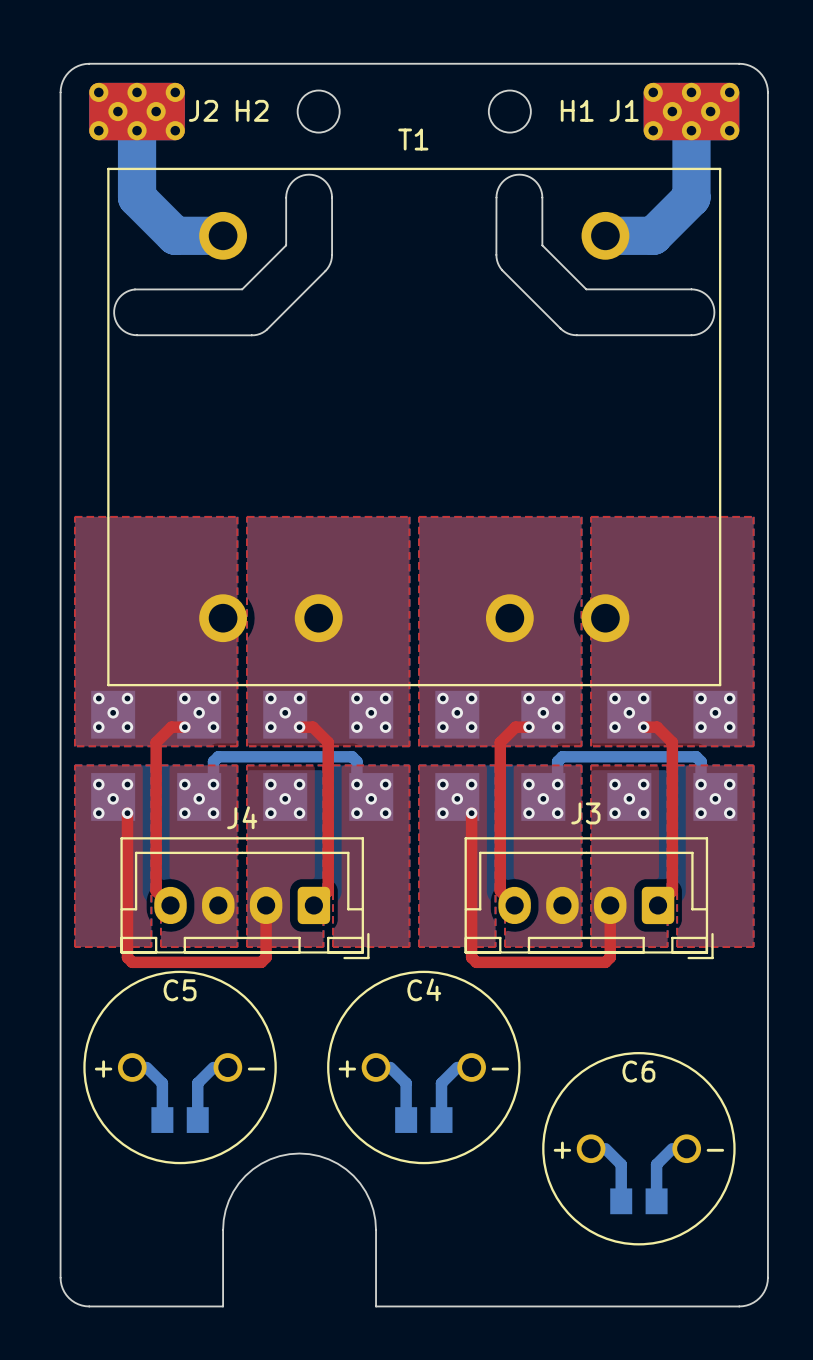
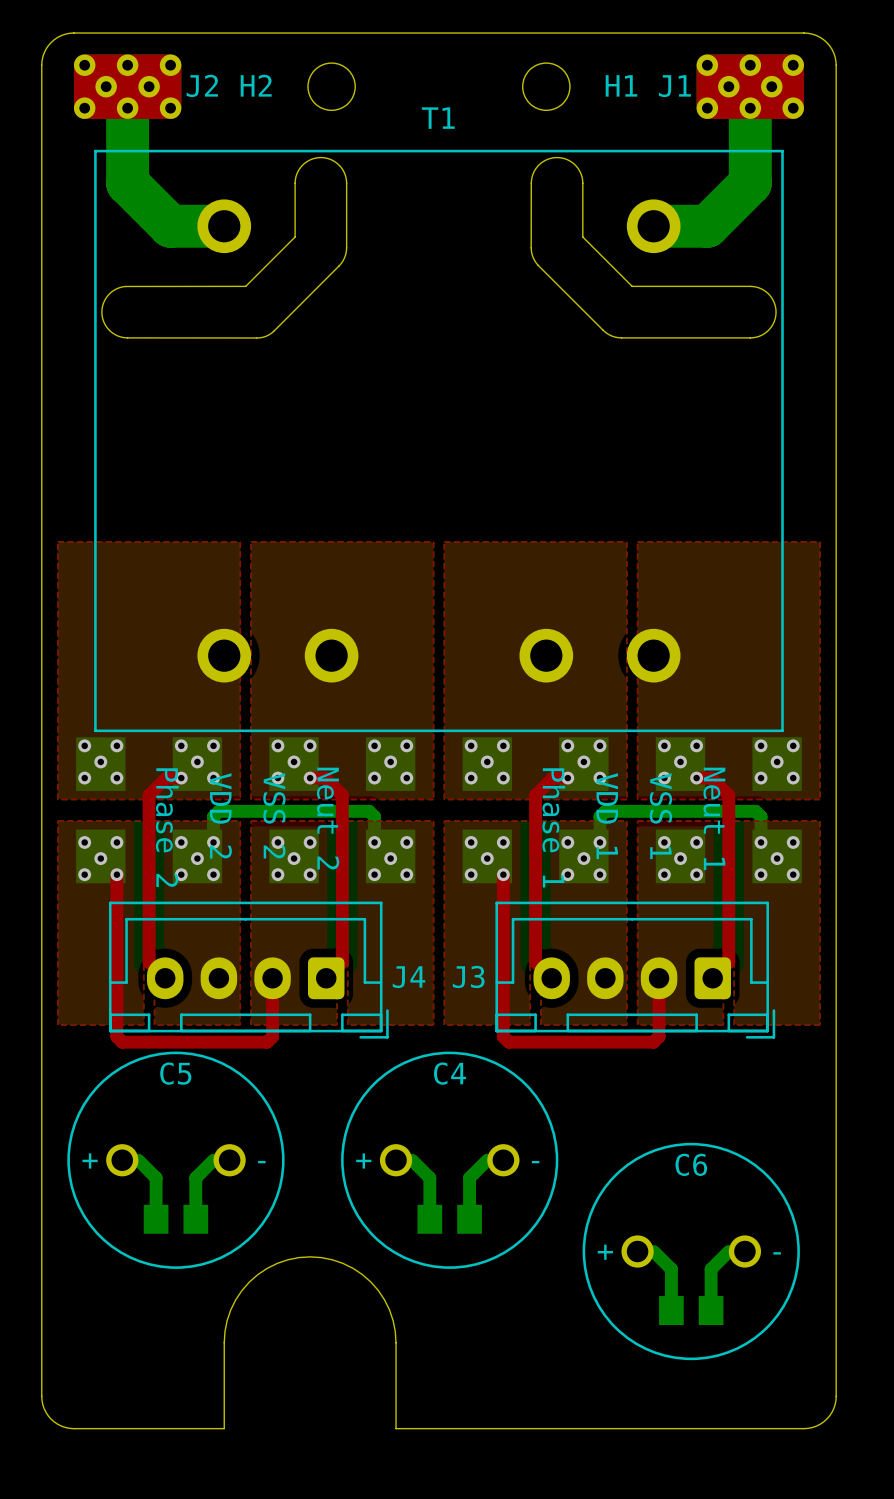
text: none -> VDD 2 (220, 815)
text: none -> VSS 2 (274, 815)
text: none -> VDD 1 (607, 816)
text: none -> VSS 1 (660, 816)
text: none -> Neut 2 (328, 818)
text: none -> Neut 1 (714, 818)
text: none -> Phase 2 (167, 827)
text: none -> Phase 1 (553, 827)
J3 name position: J3 (585, 813) -> J3 (468, 976)
J4 name position: J4 (242, 817) -> J4 (408, 977)

